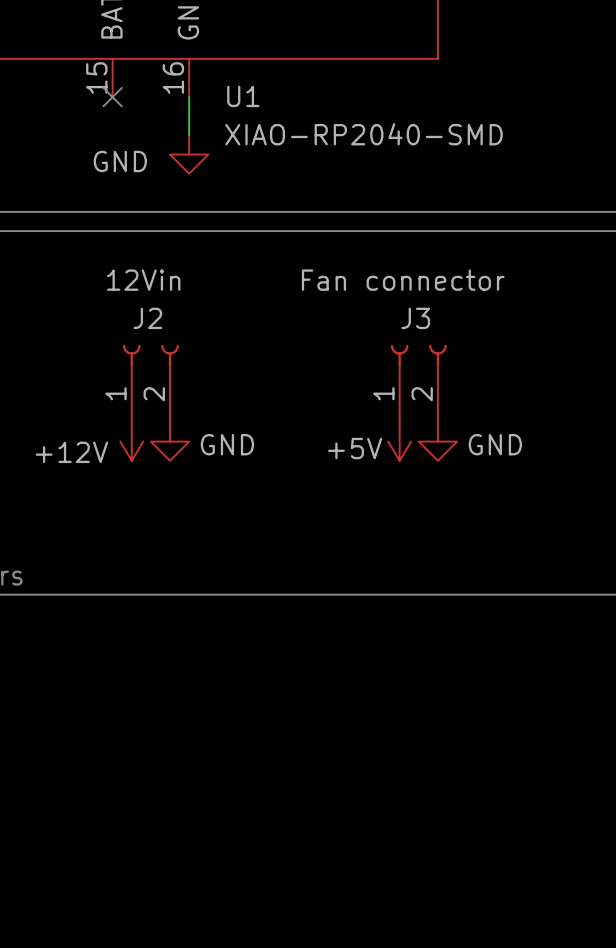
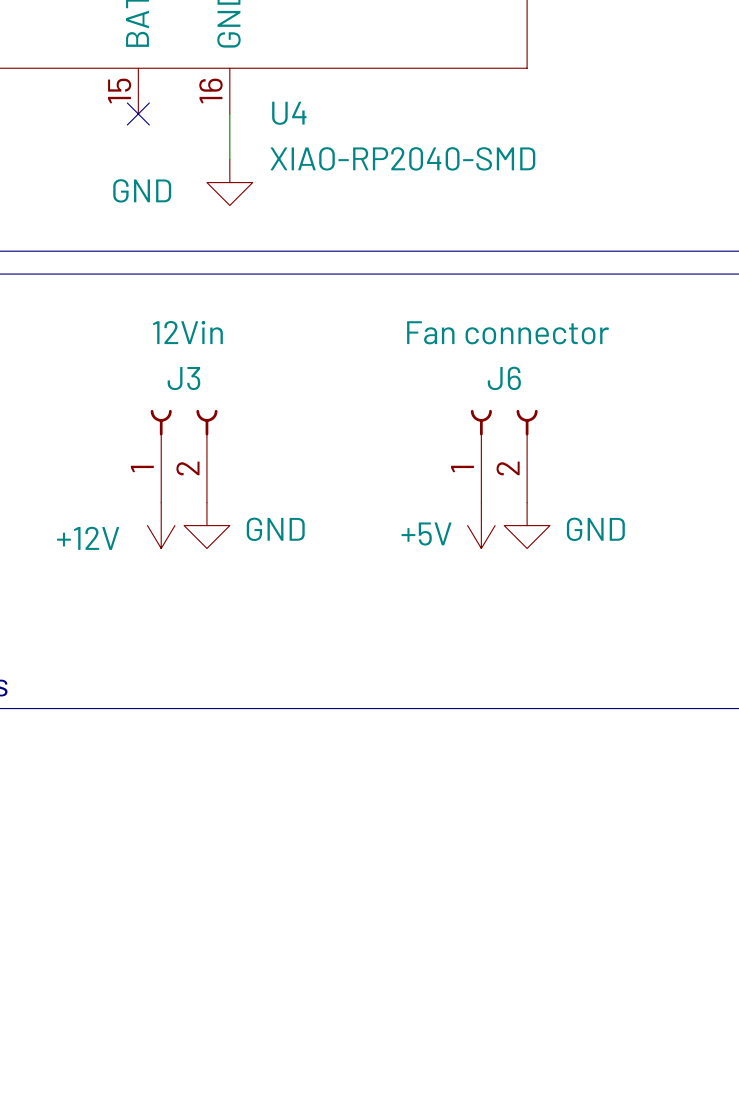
U1 name: U1 (243, 96) -> U4 (289, 113)
J2 name: J2 (147, 318) -> J3 (183, 378)
J3 name: J3 (415, 318) -> J6 (504, 378)

